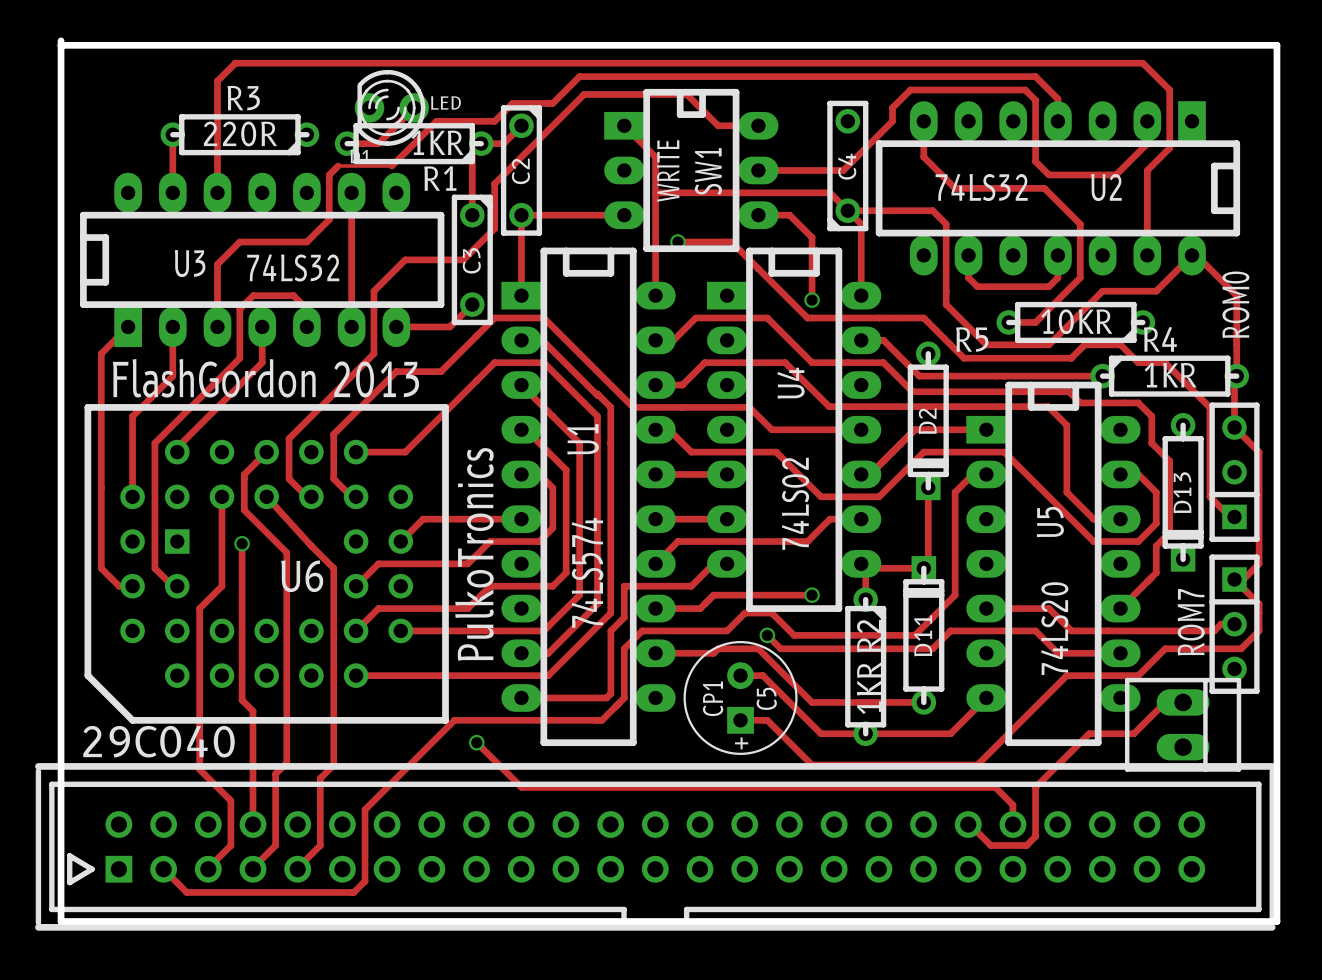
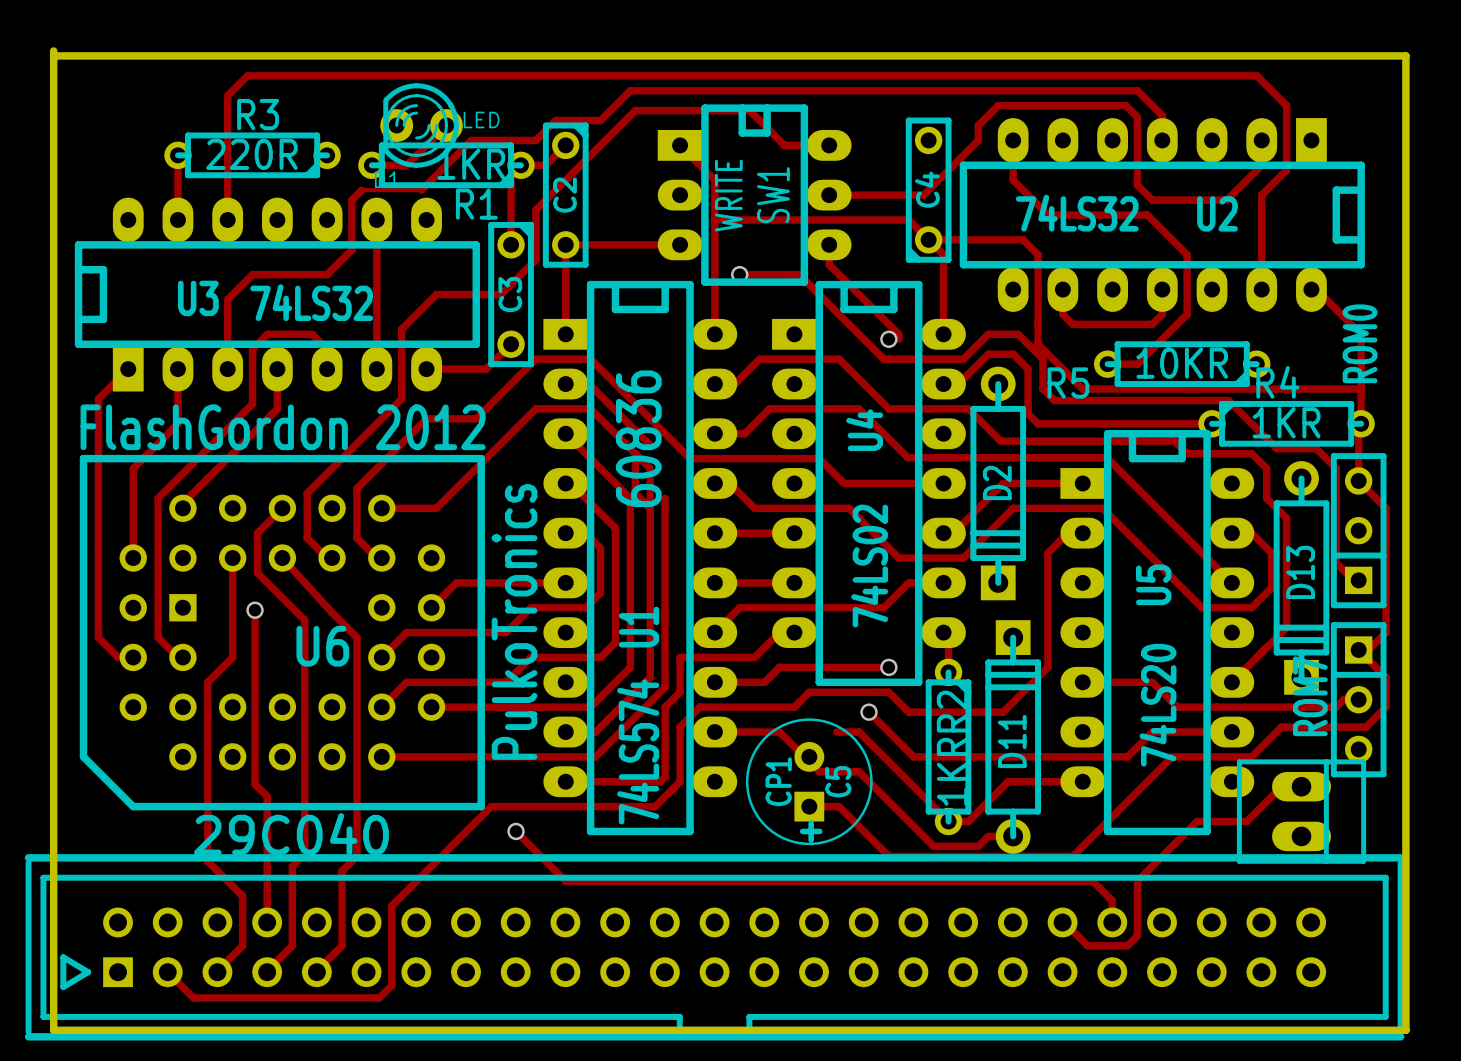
track: (758, 215) (789, 215) (812, 237) (812, 300) -> (829, 244) (829, 264) (898, 334) (898, 339)
track: (1192, 255) (1156, 291) (1102, 291) (1048, 344) -> none
track: (879, 318) (923, 318) (950, 344) -> (963, 359) (988, 334) (1018, 334) (1042, 359) (1042, 389)
track: (874, 340) (883, 340) (919, 376) (946, 376) -> (958, 384) (988, 354) (1013, 354) (1028, 369) (1028, 413) (1038, 423)
D2 footprint: [907, 341, 949, 501] -> [970, 366, 1027, 601]
track: (1084, 344) (1071, 358) (964, 358) (961, 355) -> (1192, 389) (1152, 389)
track: (1120, 344) (1138, 362) (1165, 362) (1209, 407) (1209, 496) (1214, 501) -> (1231, 389) (1361, 389)
track: none -> (1054, 400) (1228, 400) (1276, 448) (1316, 448) (1336, 468) (1336, 563)
text: FlashGordon 2013 (265, 378) -> FlashGordon 2012 (283, 427)
text: none -> 60836 (638, 438)
track: (597, 395) (610, 407) (610, 443) -> none
track: none -> (635, 453) (635, 493) (650, 508)
track: (1007, 406) (1048, 406) (1066, 425) (1066, 492) (1093, 519) (1120, 519) -> (1106, 457) (1231, 582)
D13 footprint: [1162, 413, 1204, 572] -> [1273, 461, 1330, 695]
U1 name position: U1 (583, 439) -> U1 (639, 627)
track: (928, 487) (928, 563) (923, 568) (865, 568) -> none
track: (1169, 532) (1156, 545) (1156, 572) -> (1286, 597) (1286, 627) (1271, 642)
D11 footprint: [903, 556, 945, 715] -> [985, 620, 1042, 854]
U1 value position: 74LS574 (587, 572) -> 74LS574 (638, 751)
track: (740, 617) (745, 613) (771, 613) (794, 635) (829, 635) -> (809, 692) (888, 692) (908, 712)
track: (767, 635) (780, 648) (932, 648) (950, 630) (1035, 630) (1057, 653) -> (868, 712) (913, 756) (1127, 756) (1152, 732) (1162, 732)
via position: (767, 635) -> (868, 712)
track: (713, 653) (718, 648) (758, 648) (812, 702) (923, 702) -> (779, 732) (819, 771) (859, 771) (933, 846) (978, 846) (988, 836) (1013, 836) (1013, 831)
track: (740, 675) (762, 675) (821, 733) (865, 733) -> (836, 732) (859, 732) (948, 821)
track: (986, 697) (950, 733) (883, 733) -> (1082, 781) (1008, 781) (968, 821)
U6 value position: 29C040 (159, 741) -> 29C040 (291, 834)

